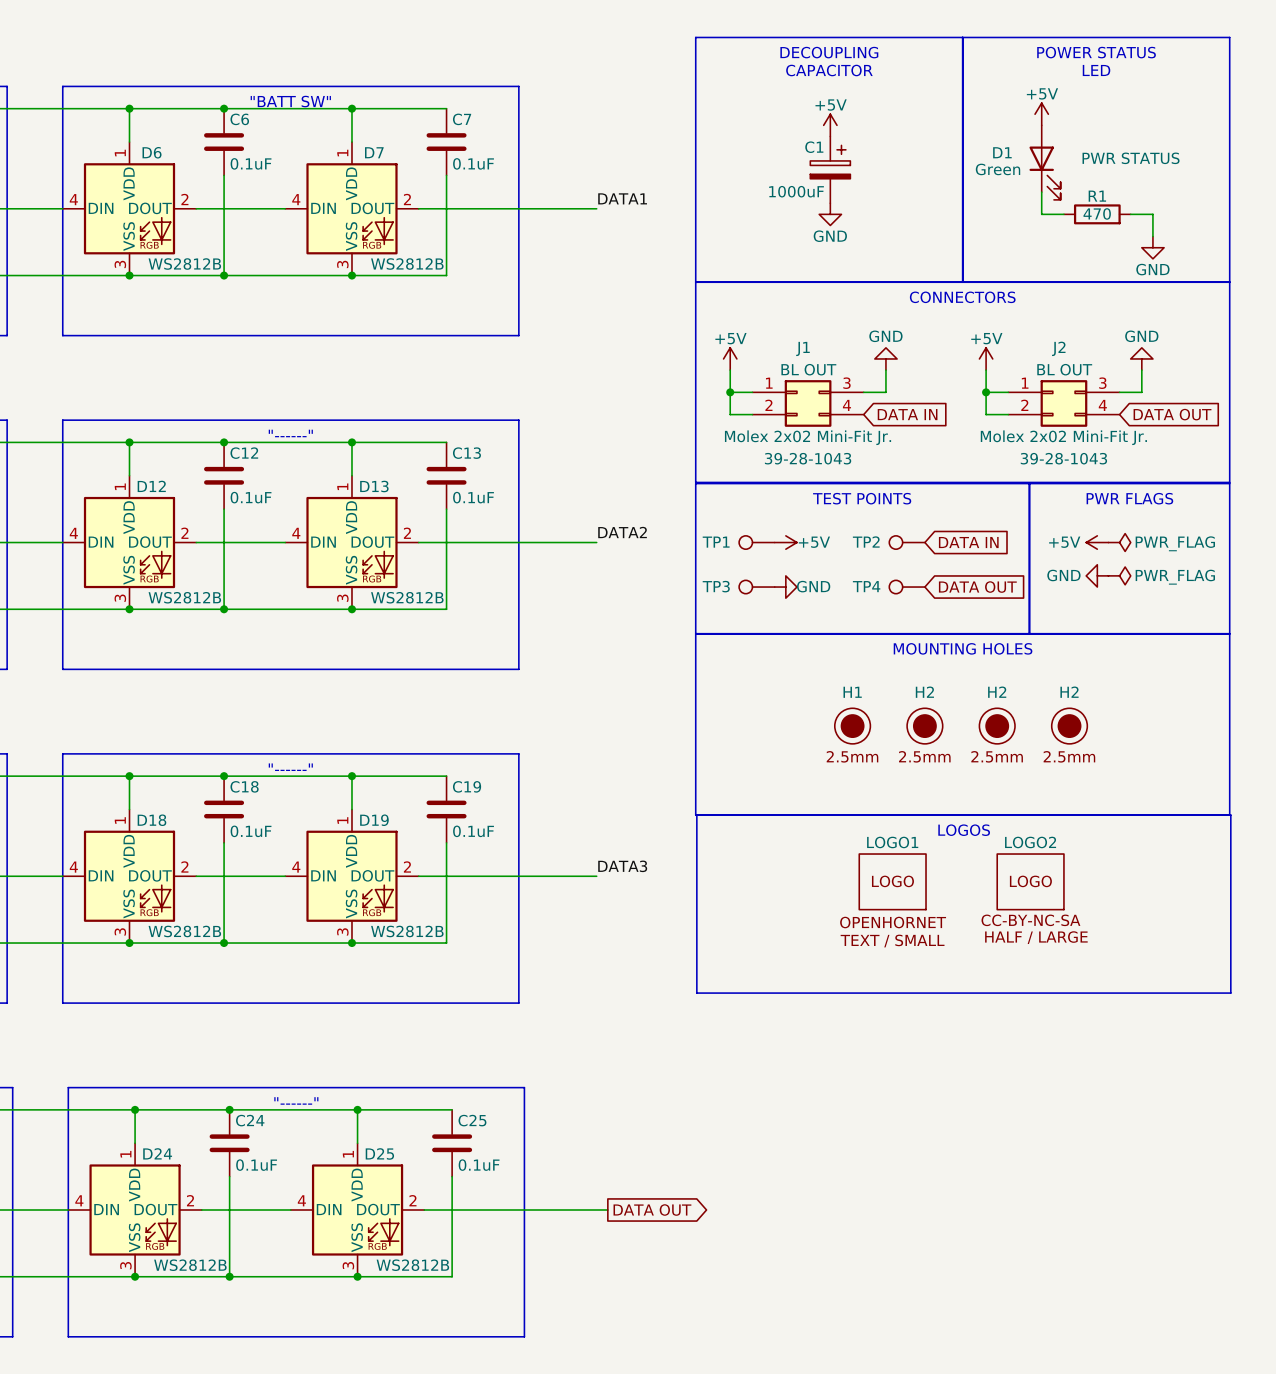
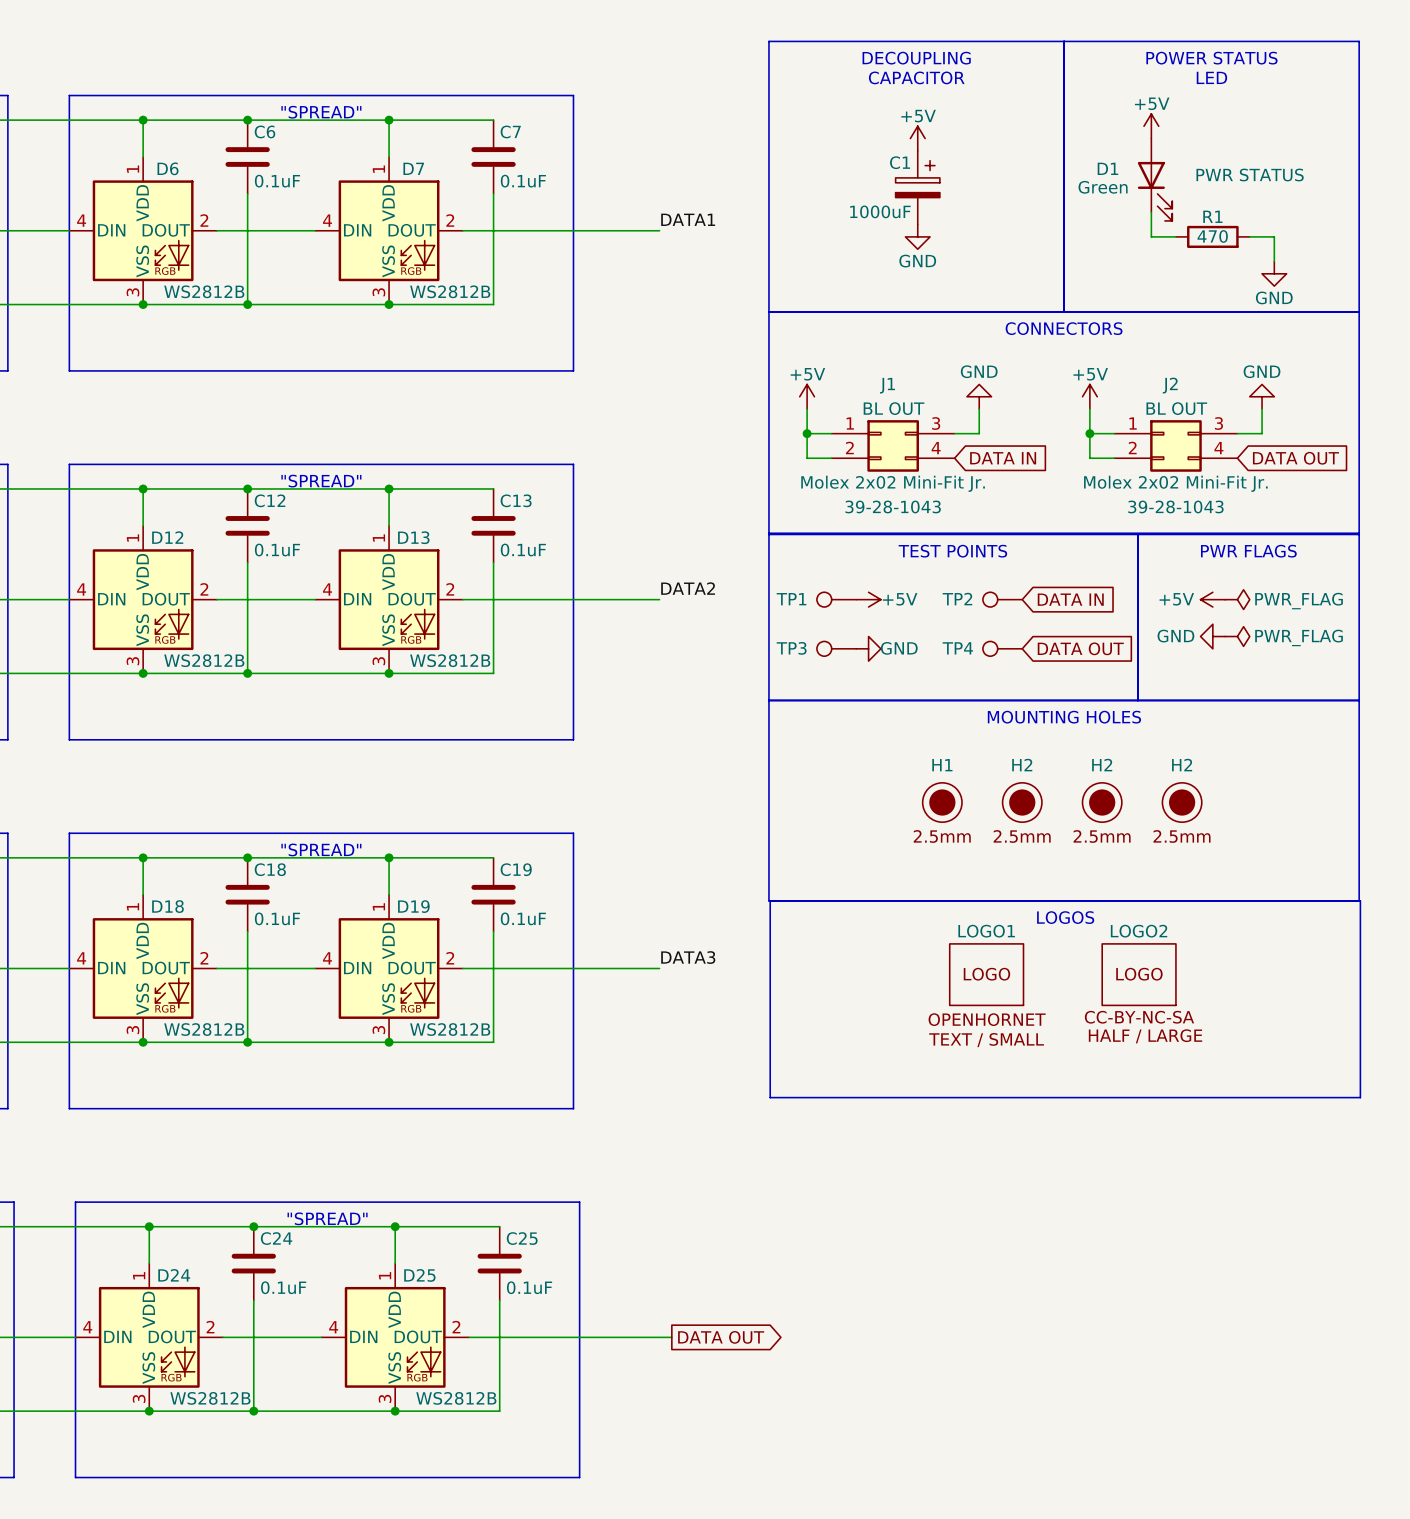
text: "BATT SW" (290, 101) -> "SPREAD" (321, 112)
text: "------" (290, 433) -> "SPREAD" (321, 481)
text: "------" (290, 767) -> "SPREAD" (321, 849)
text: "------" (296, 1100) -> "SPREAD" (327, 1218)

